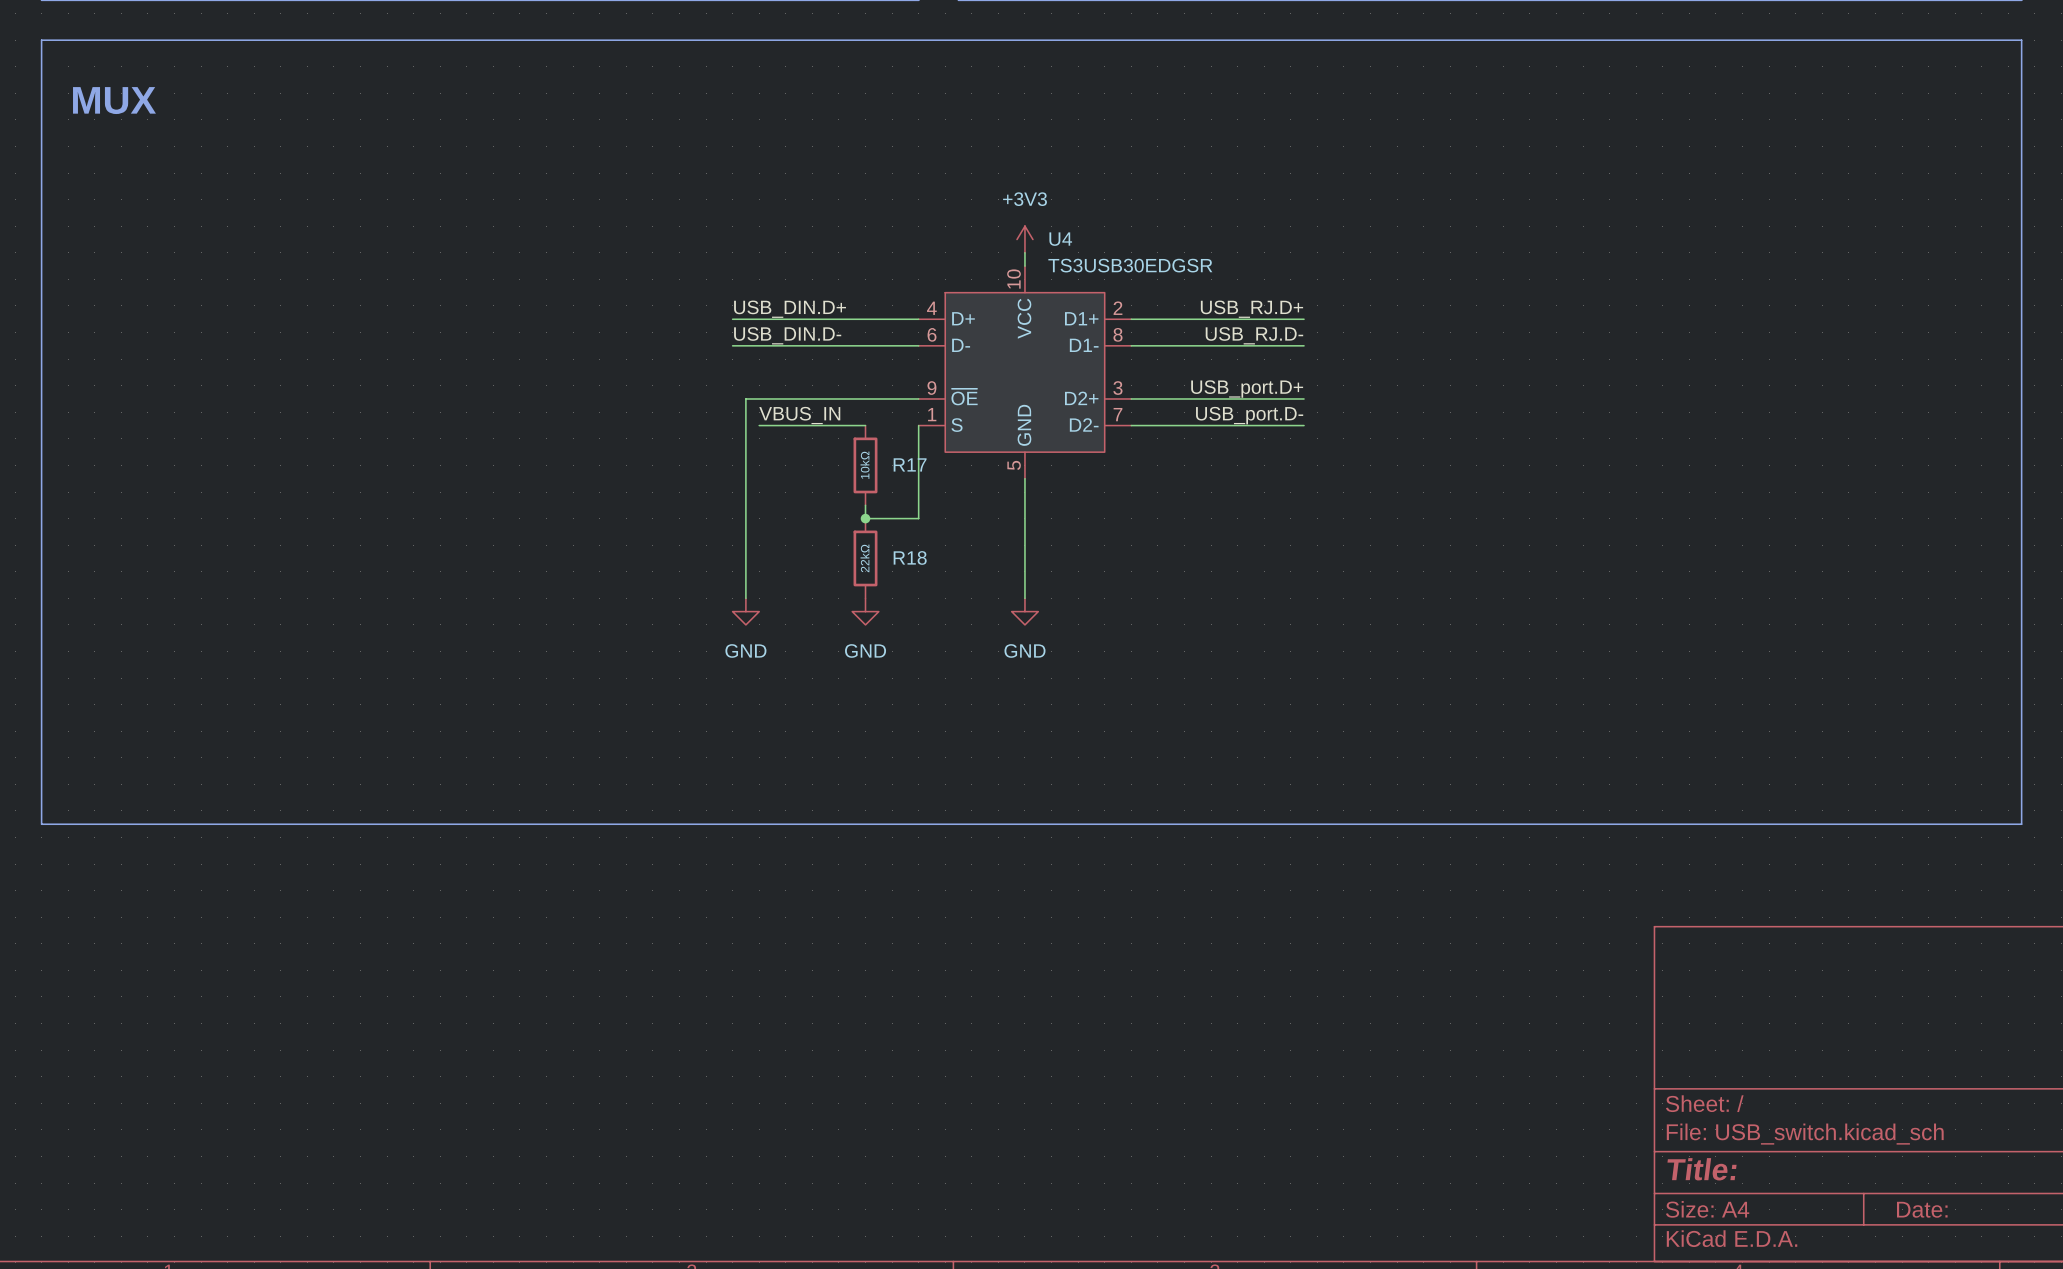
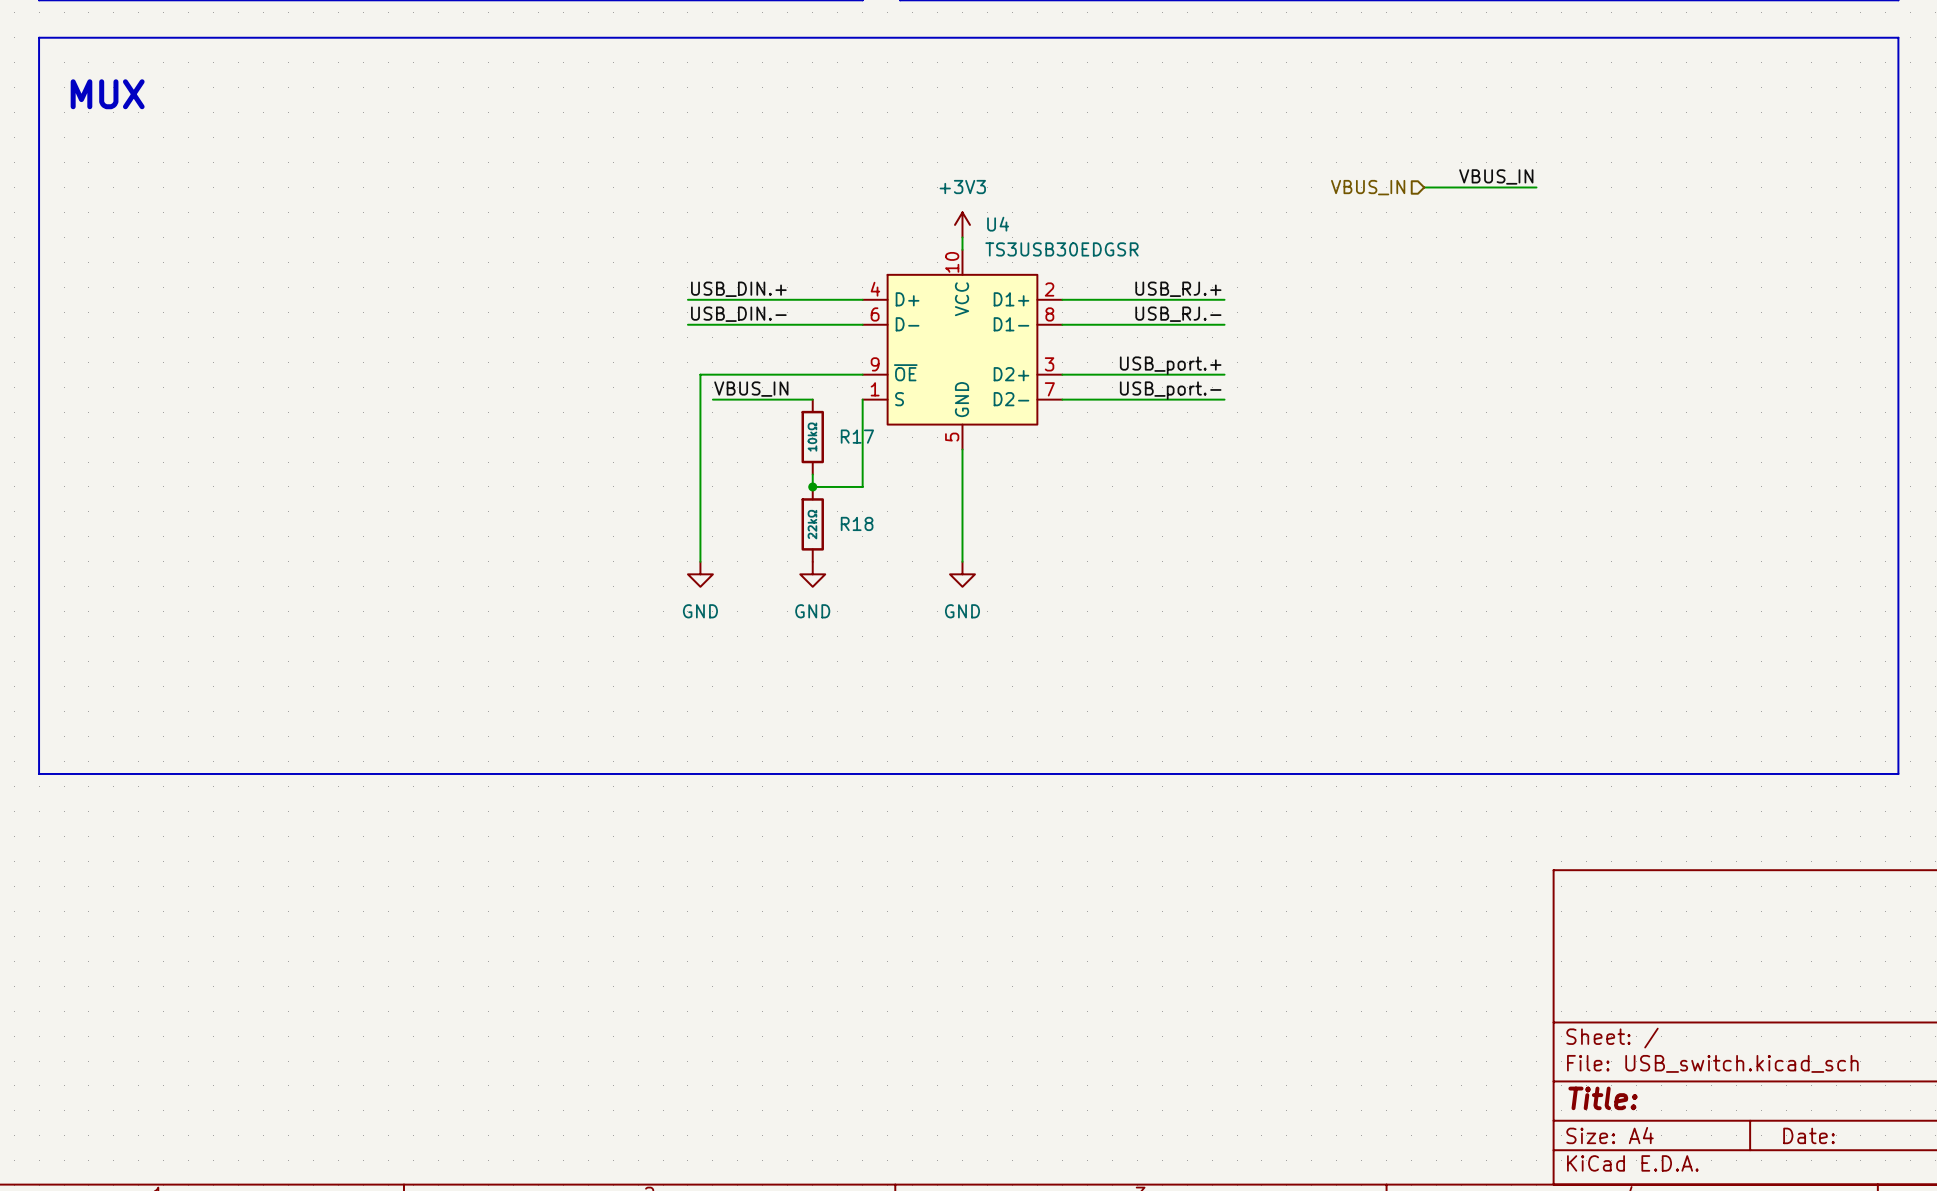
label: none -> VBUS_IN (1496, 176)
wire: none -> (1424, 187) (1536, 187)
hierarchical label: none -> VBUS_IN (1368, 187)
label: USB_DIN.D+ (790, 309) -> USB_DIN.+ (738, 289)
label: USB_RJ.D+ (1251, 309) -> USB_RJ.+ (1178, 289)
label: USB_DIN.D- (787, 335) -> USB_DIN.- (738, 314)
label: USB_RJ.D- (1254, 335) -> USB_RJ.- (1178, 314)
label: USB_port.D+ (1247, 389) -> USB_port.+ (1170, 365)
label: USB_port.D- (1249, 415) -> USB_port.- (1170, 390)

